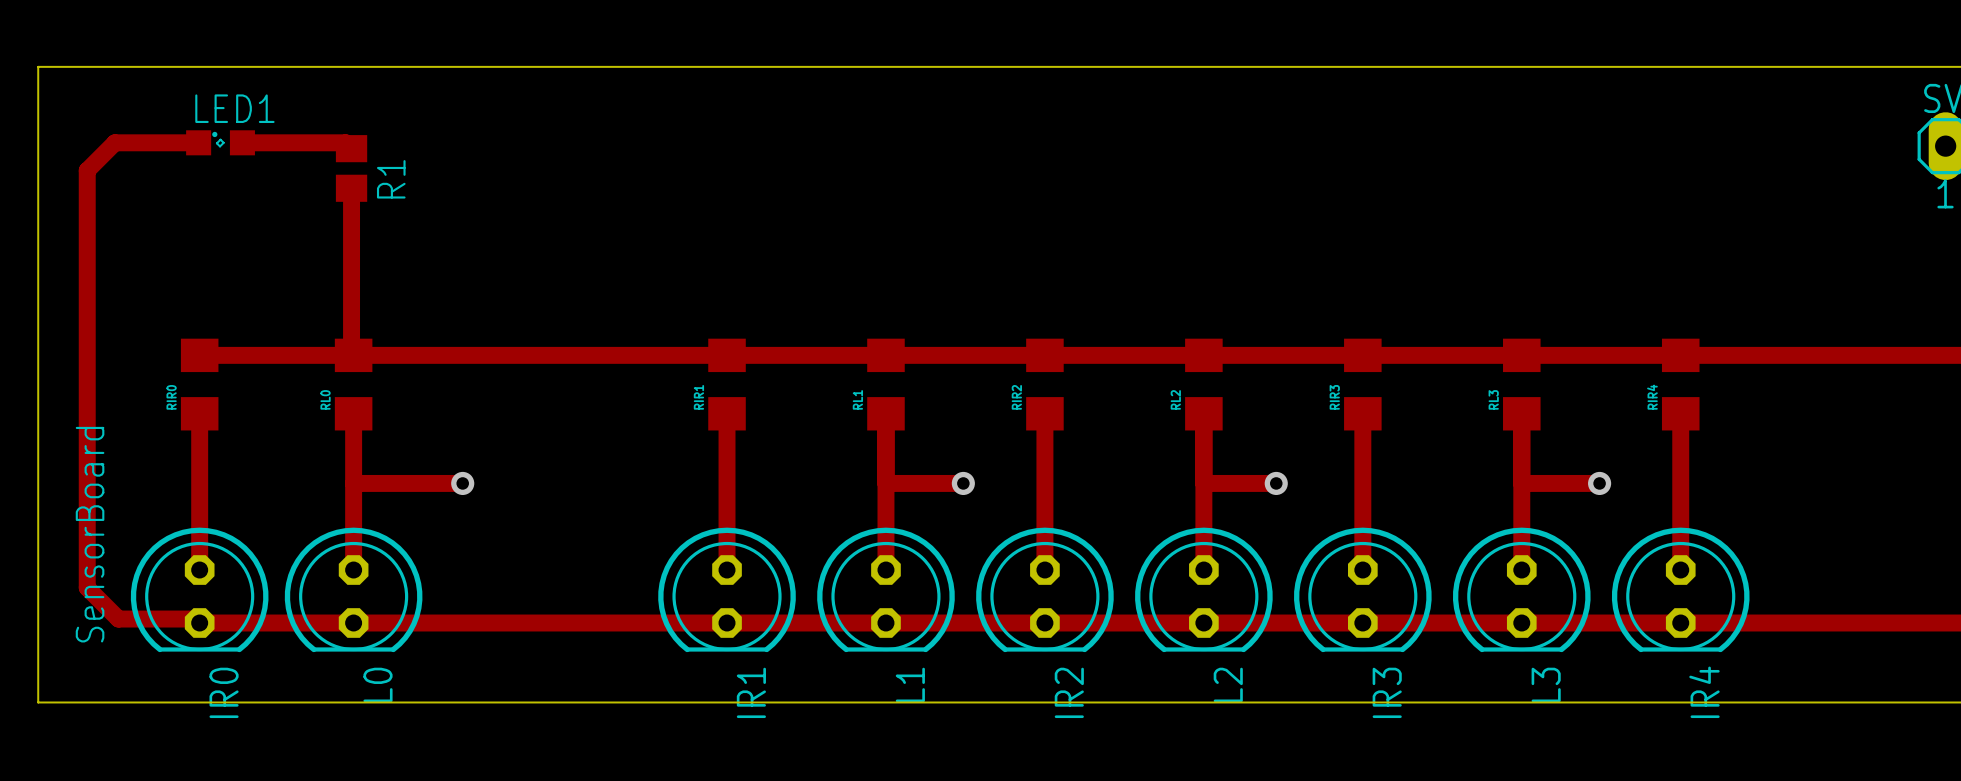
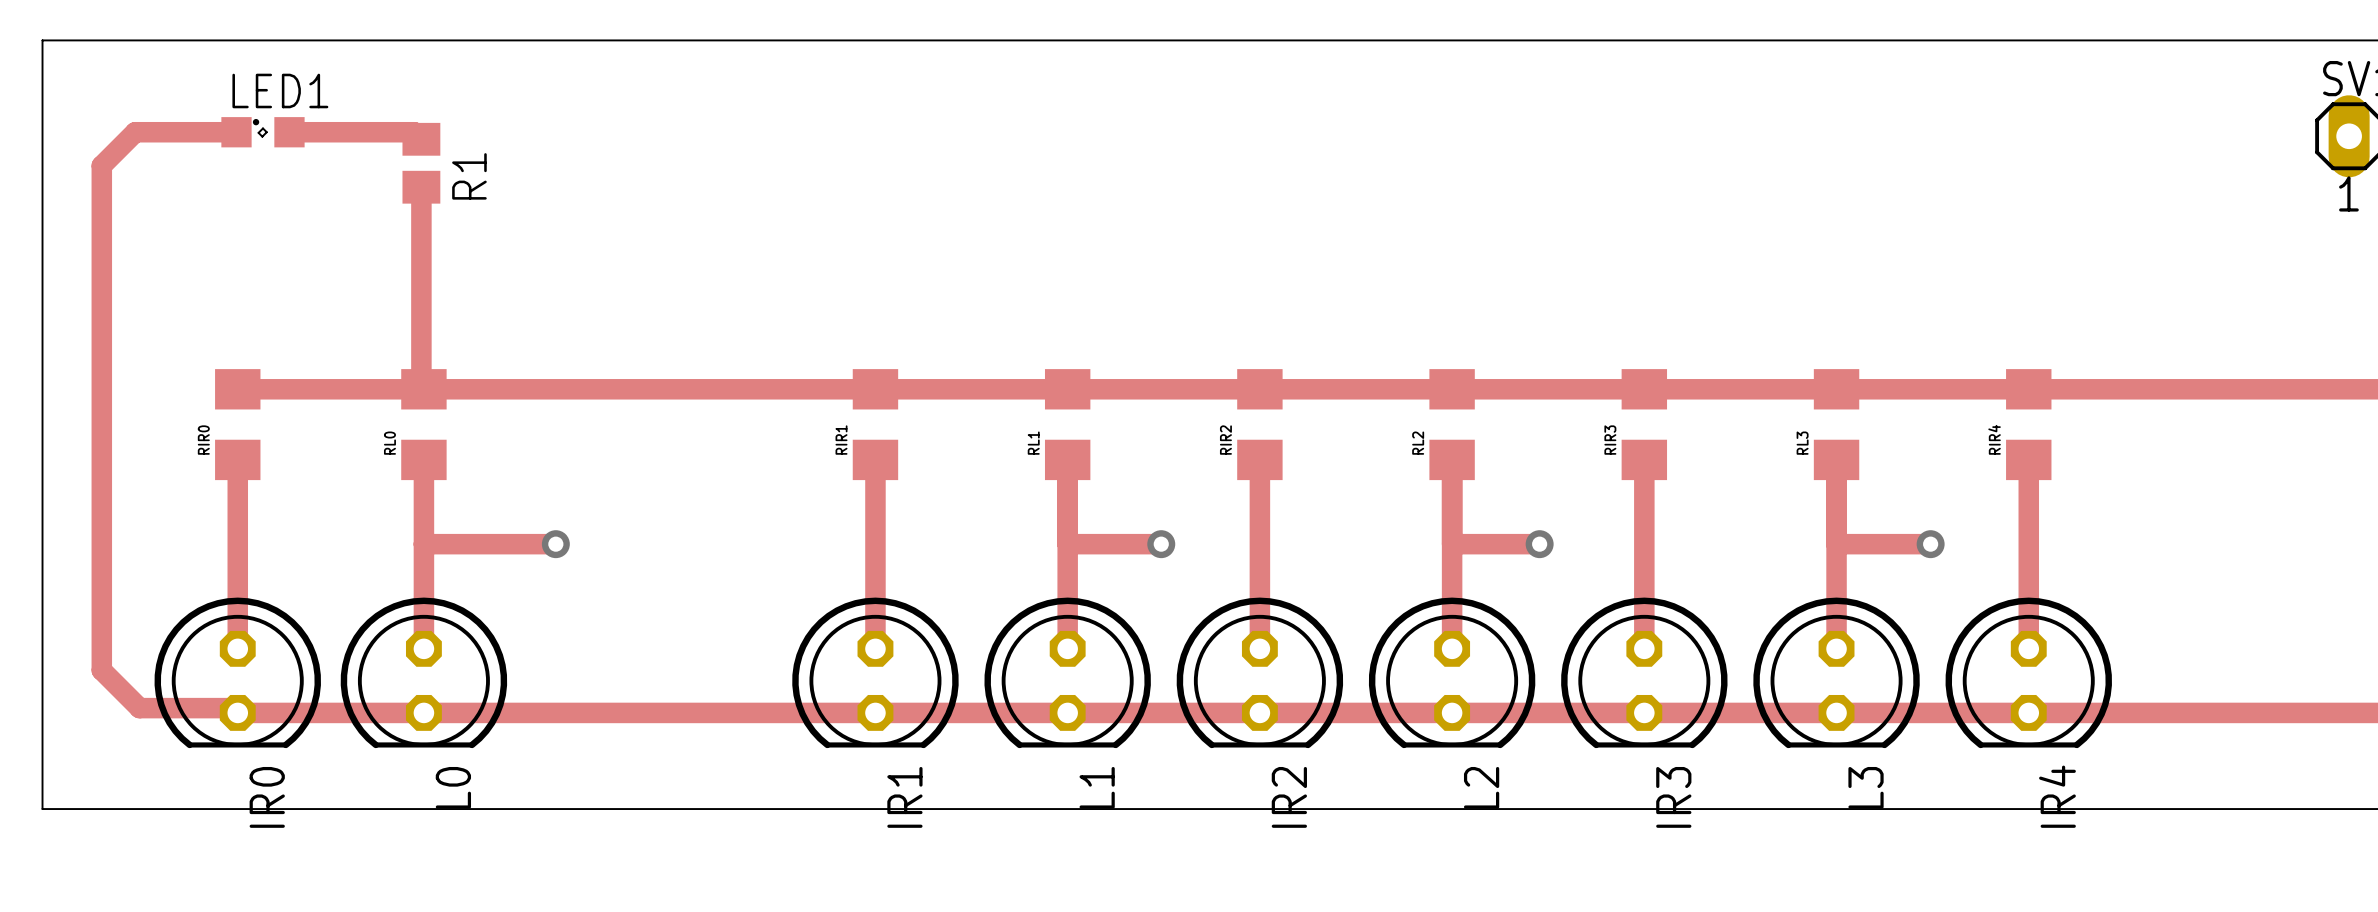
text: SensorBoard (90, 534) -> none

